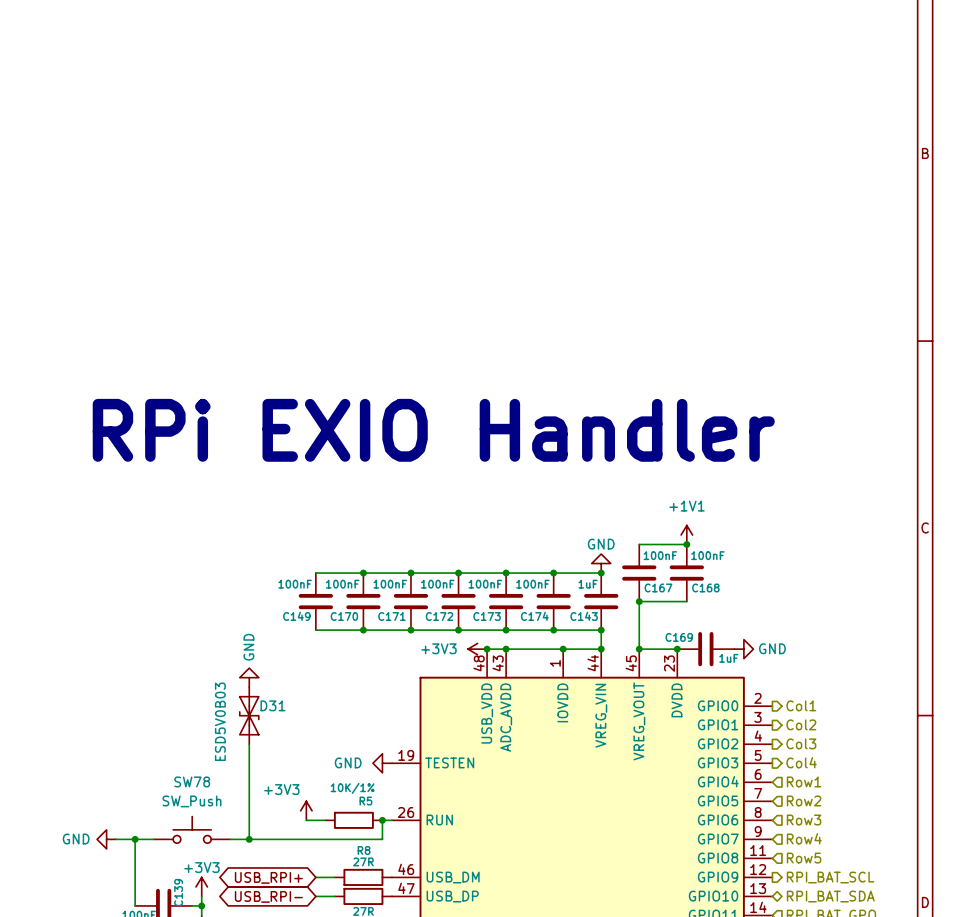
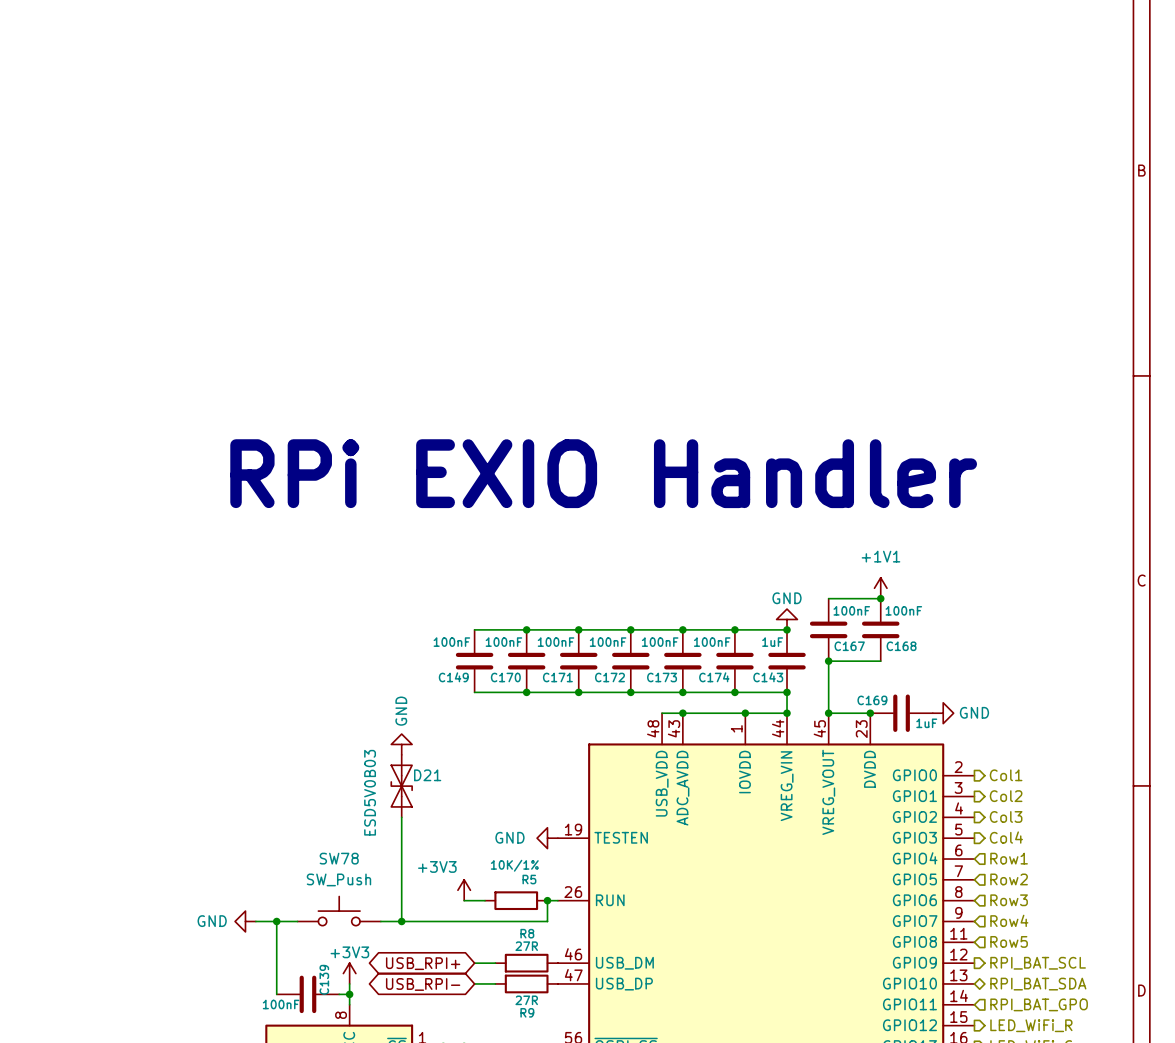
power symbol: +3V3 (477, 649) -> none
junction: (487, 649) -> none
D31 name: D31 (272, 705) -> D21 (427, 775)

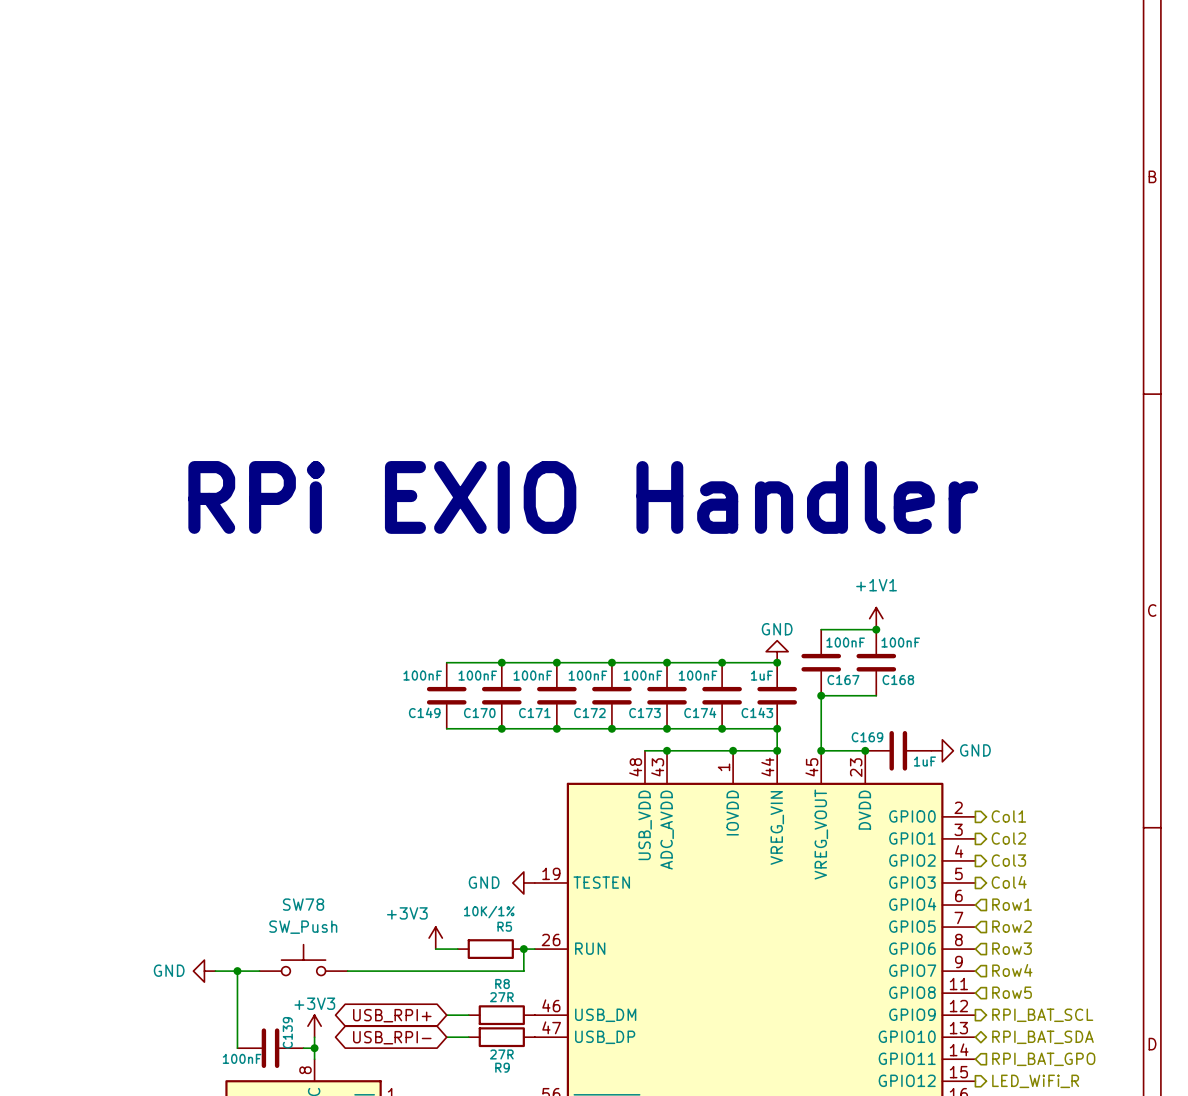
power symbol: GND (401, 744) -> none
D21: ESD5V0B03 (401, 786) -> none
wire: (401, 817) (401, 921) -> none
junction: (401, 921) -> none

